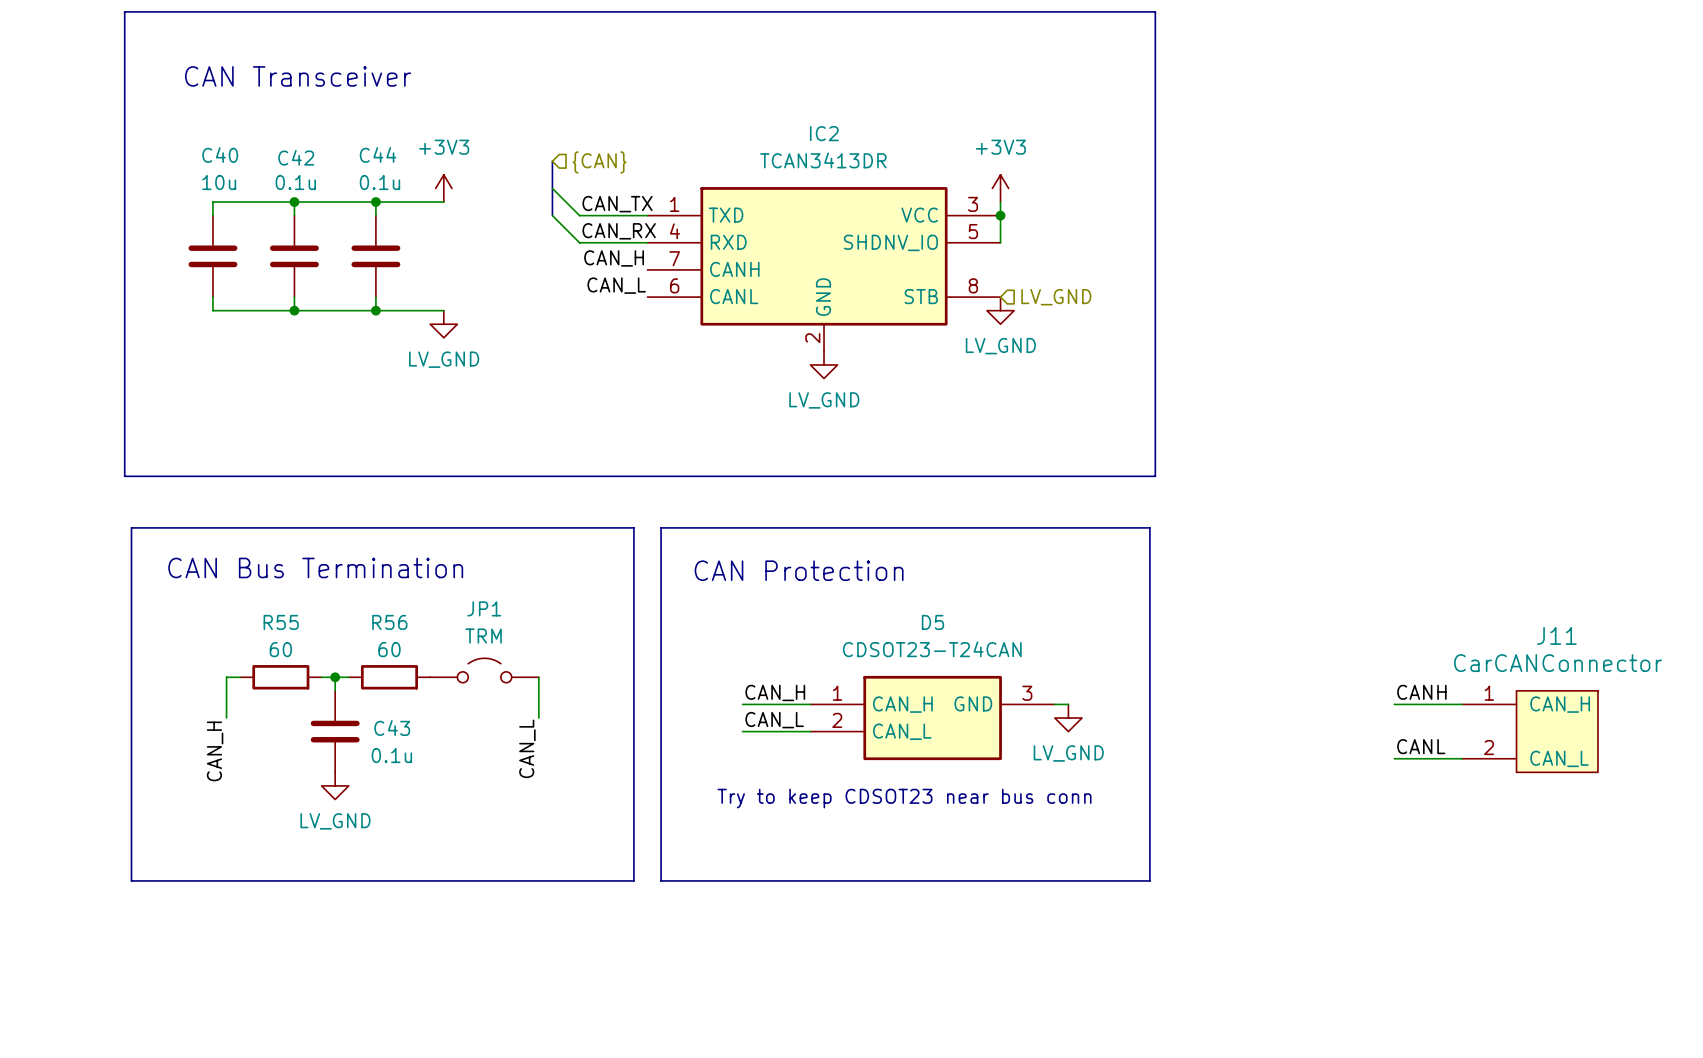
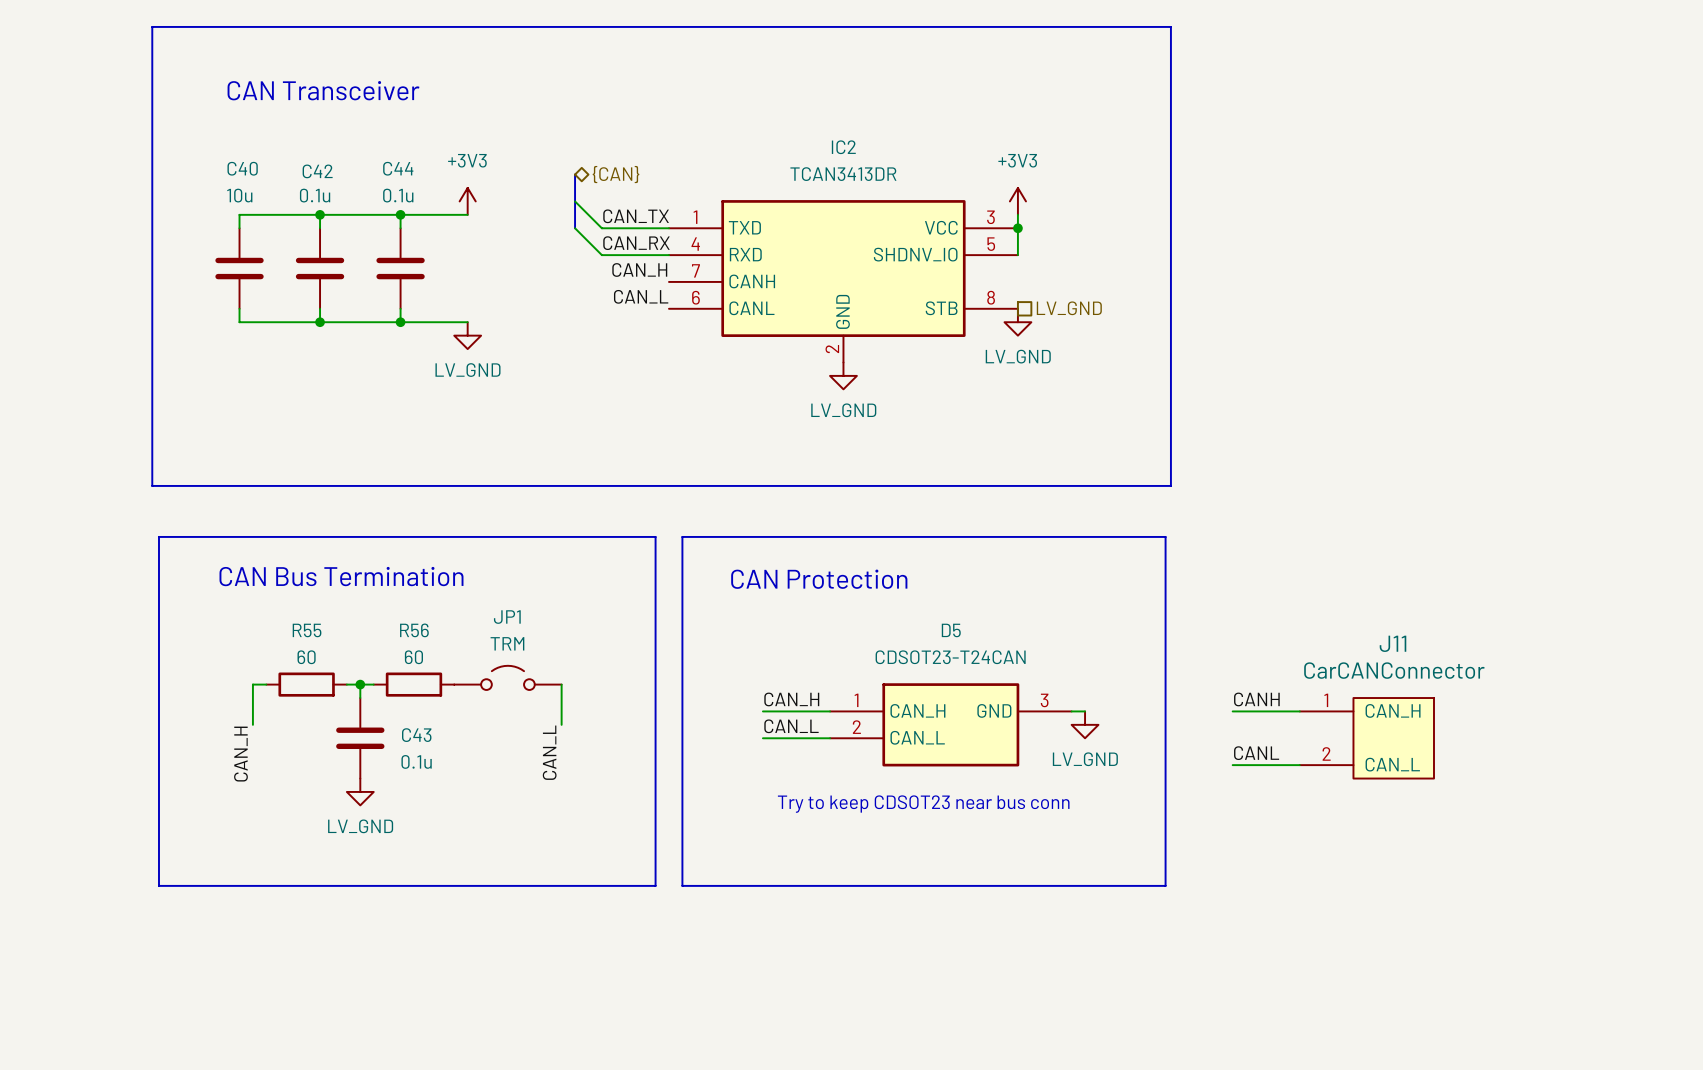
hierarchical label shape: input (599, 162) -> bidirectional (616, 174)
hierarchical label shape: input (1056, 297) -> passive (1069, 308)
label position: CANH (1421, 692) -> CANH (1256, 699)
wire: (1394, 704) (1462, 704) -> (1232, 711) (1299, 711)
J11 position: (1530, 731) -> (1366, 738)
label position: CANL (1421, 746) -> CANL (1256, 753)
wire: (1394, 758) (1462, 758) -> (1232, 765) (1299, 765)

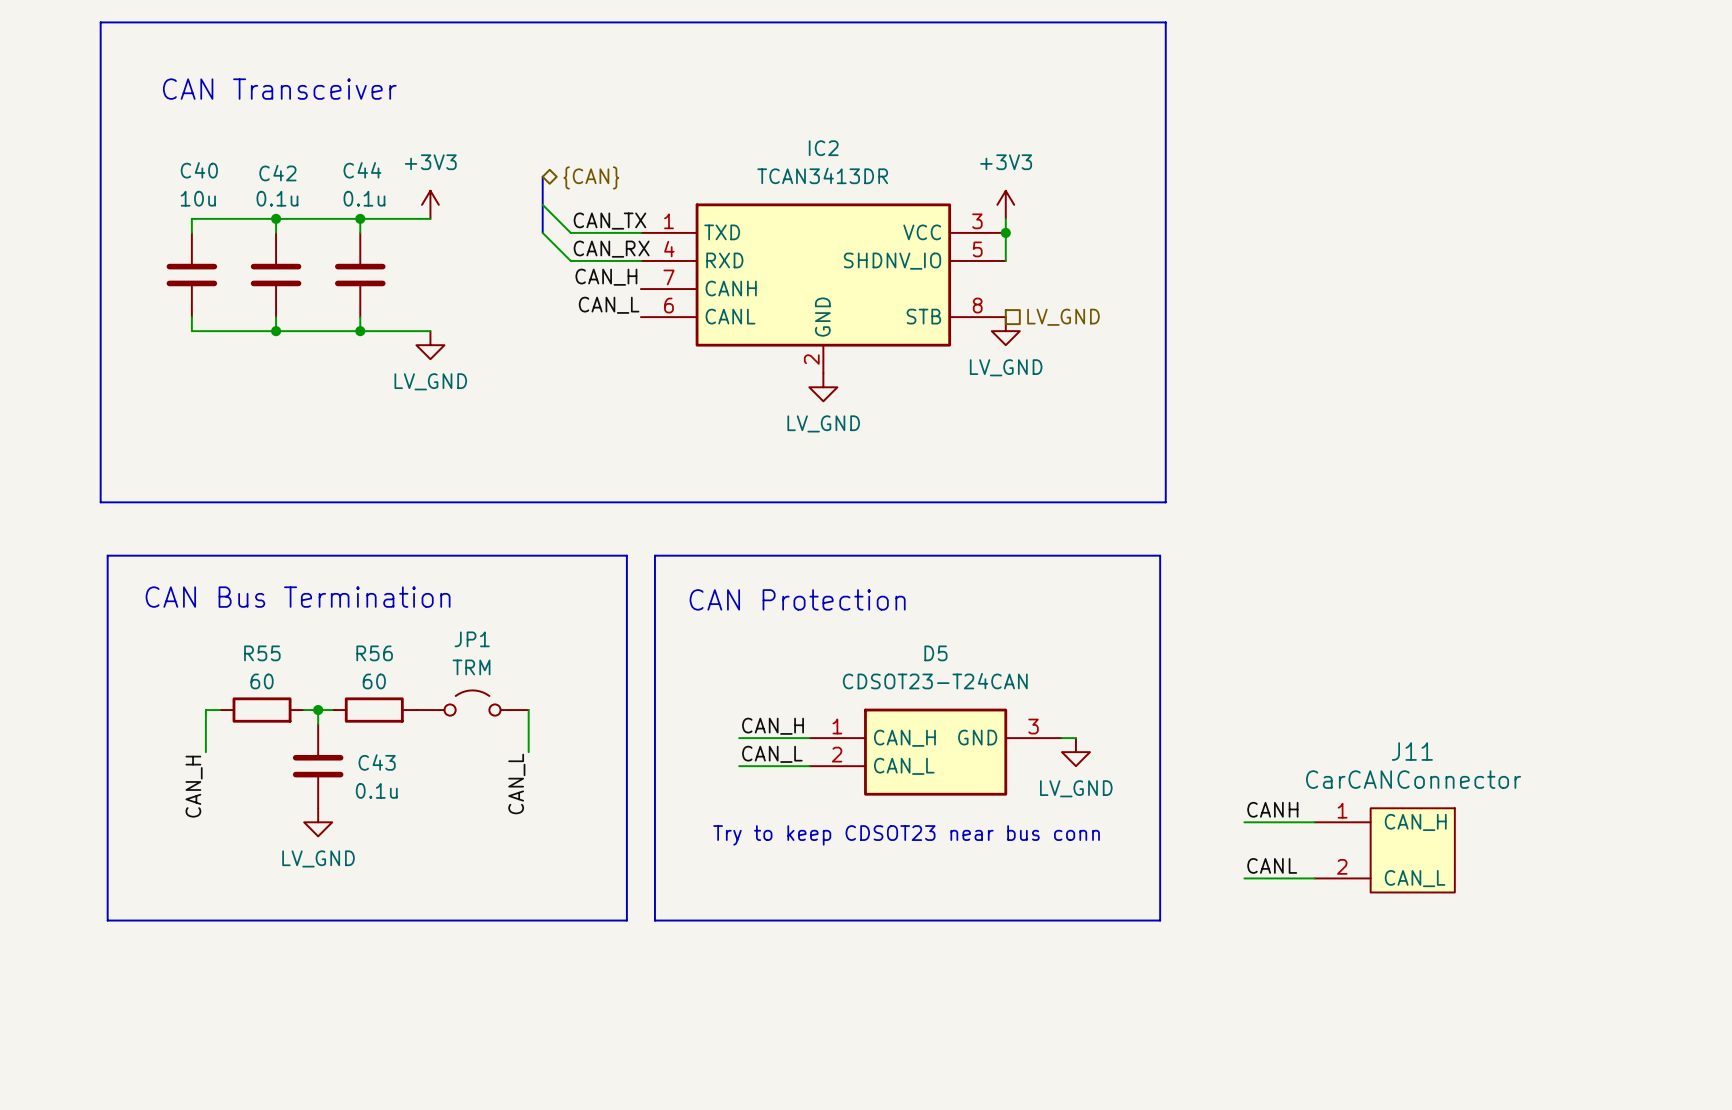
label position: CANH (1256, 699) -> CANH (1272, 809)
wire: (1232, 711) (1299, 711) -> (1244, 878) (1314, 878)
J11 position: (1366, 738) -> (1384, 850)
label position: CANL (1256, 753) -> CANL (1272, 865)
wire: (1232, 765) (1299, 765) -> (1244, 822) (1314, 822)

